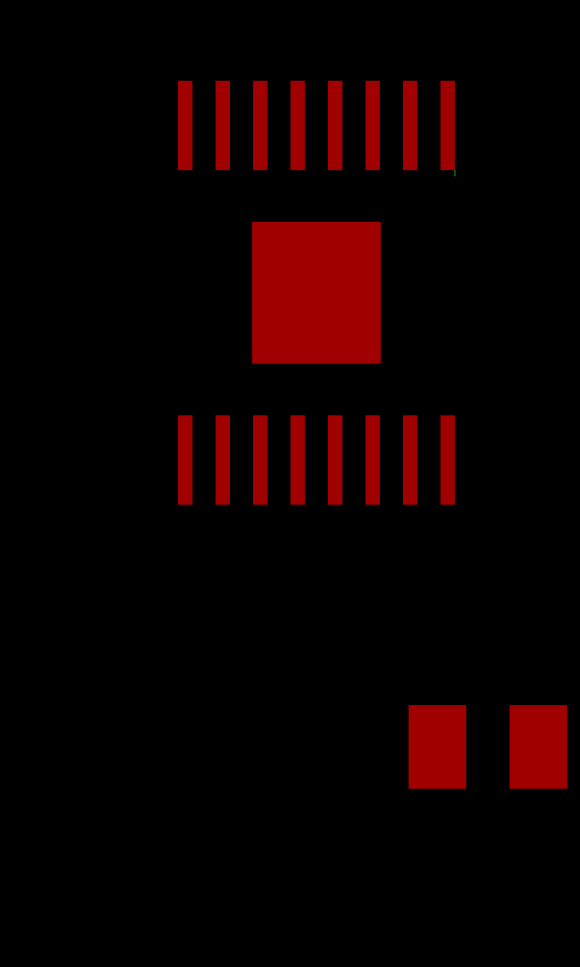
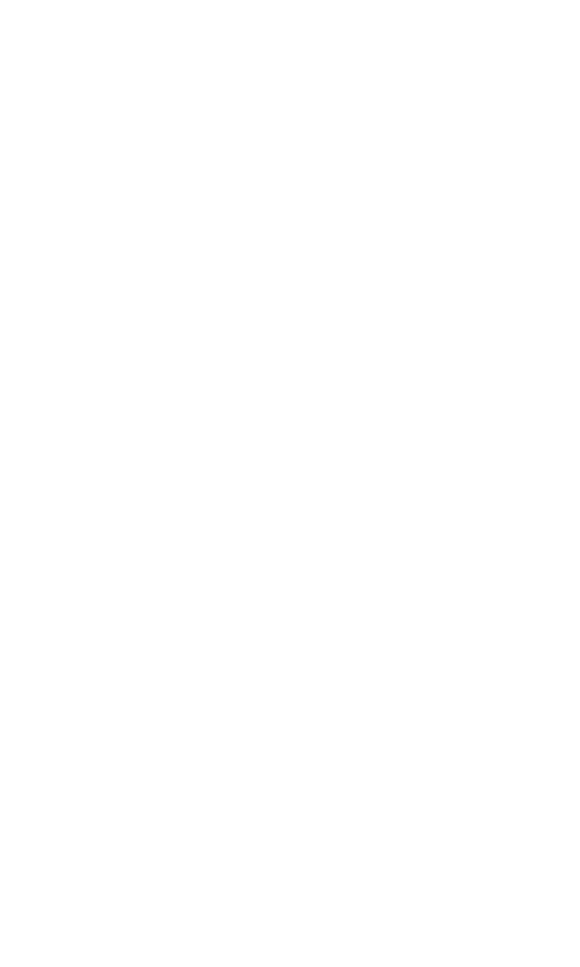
part: (316, 292) -> none
part: (487, 746) -> none

